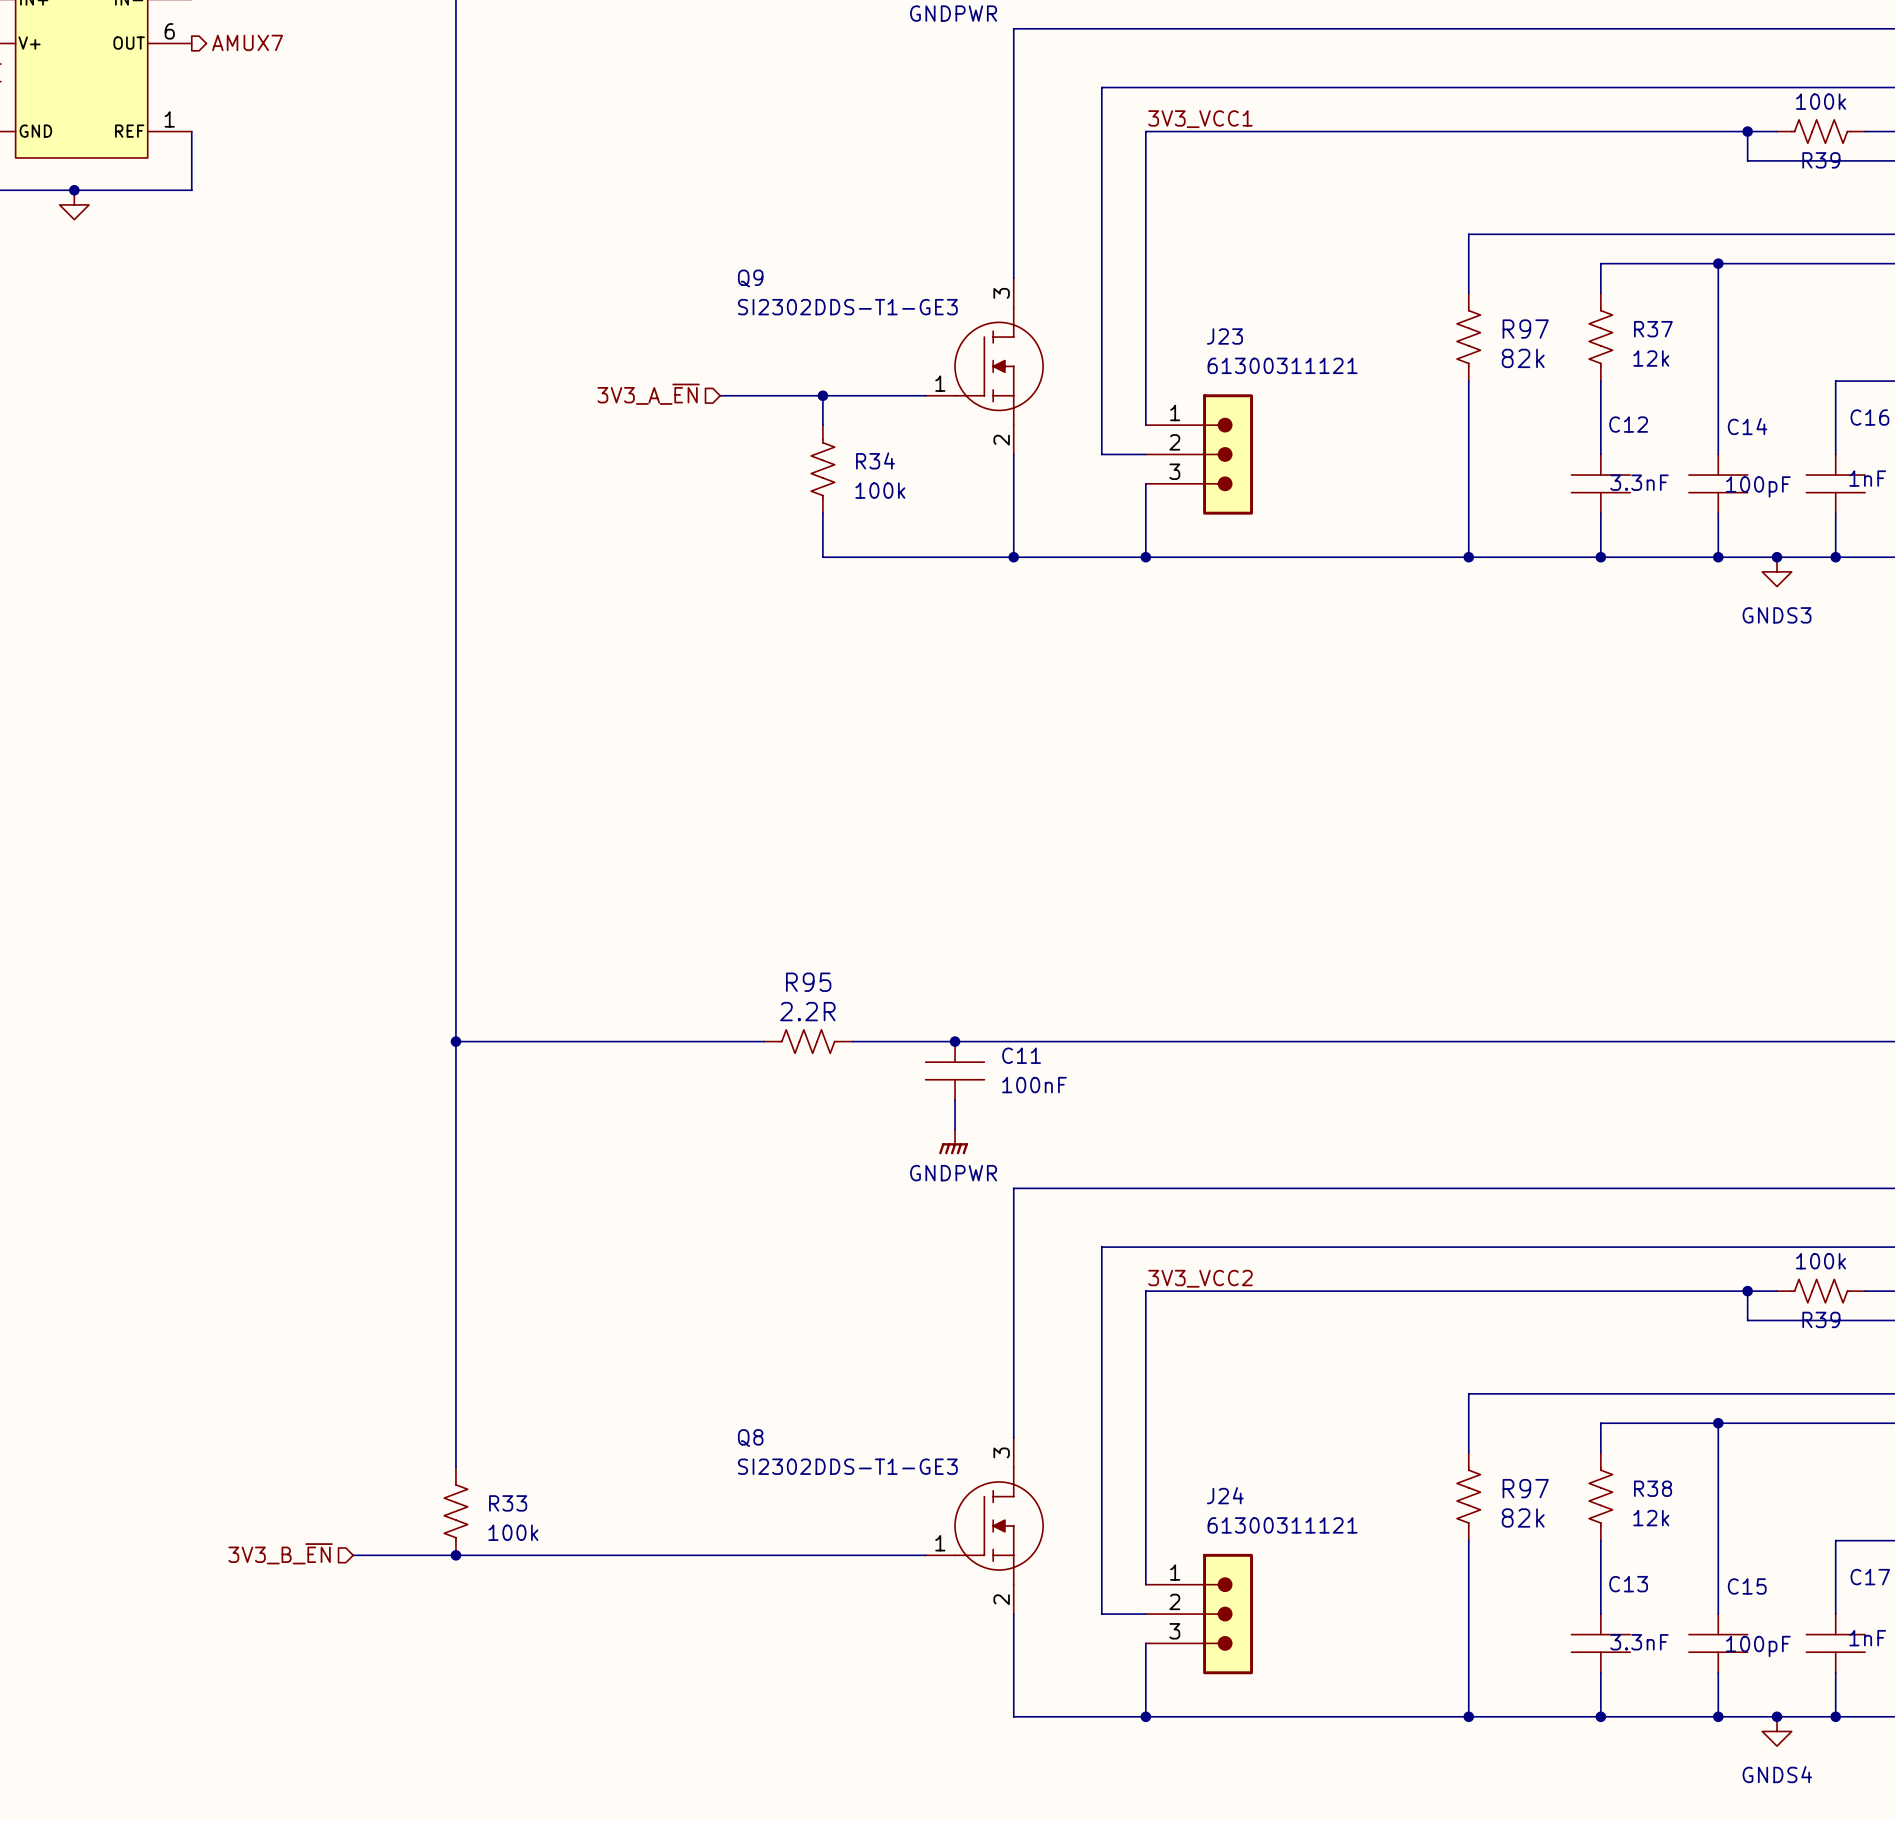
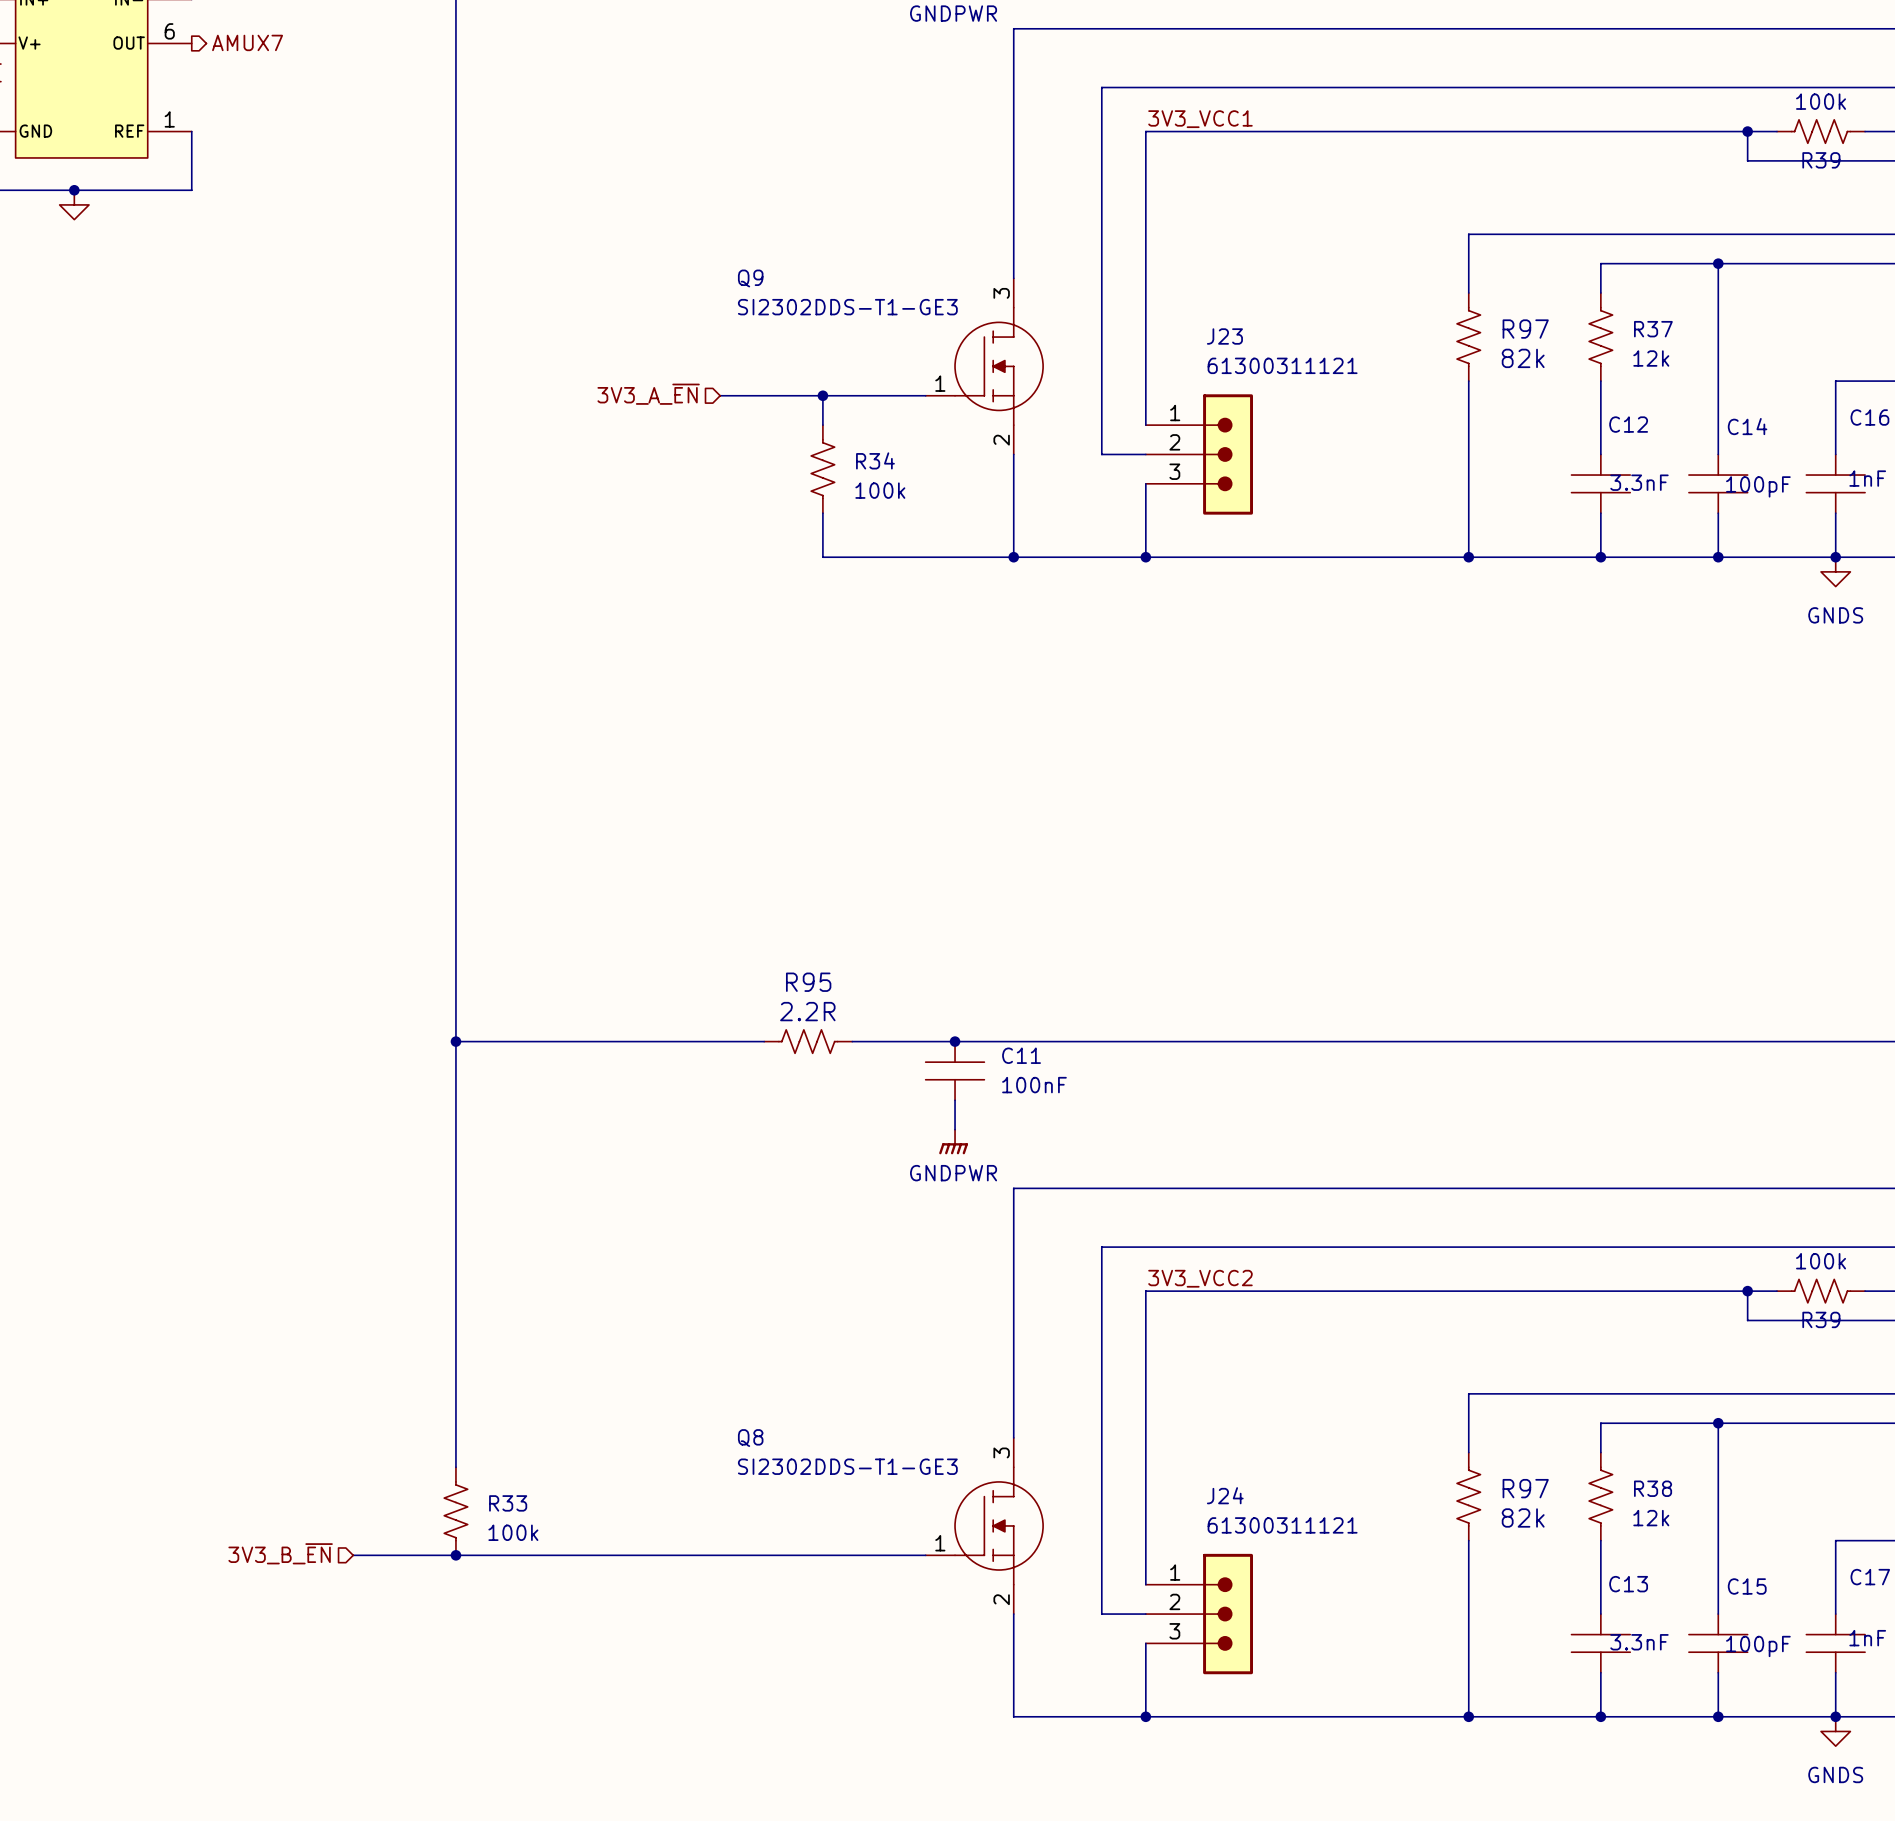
junction: (1777, 557) -> none
power symbol: GNDS3 (1777, 571) -> none
power symbol: none -> GNDS (1835, 571)
junction: (1777, 1716) -> none
power symbol: GNDS4 (1777, 1731) -> none
power symbol: none -> GNDS (1835, 1731)

